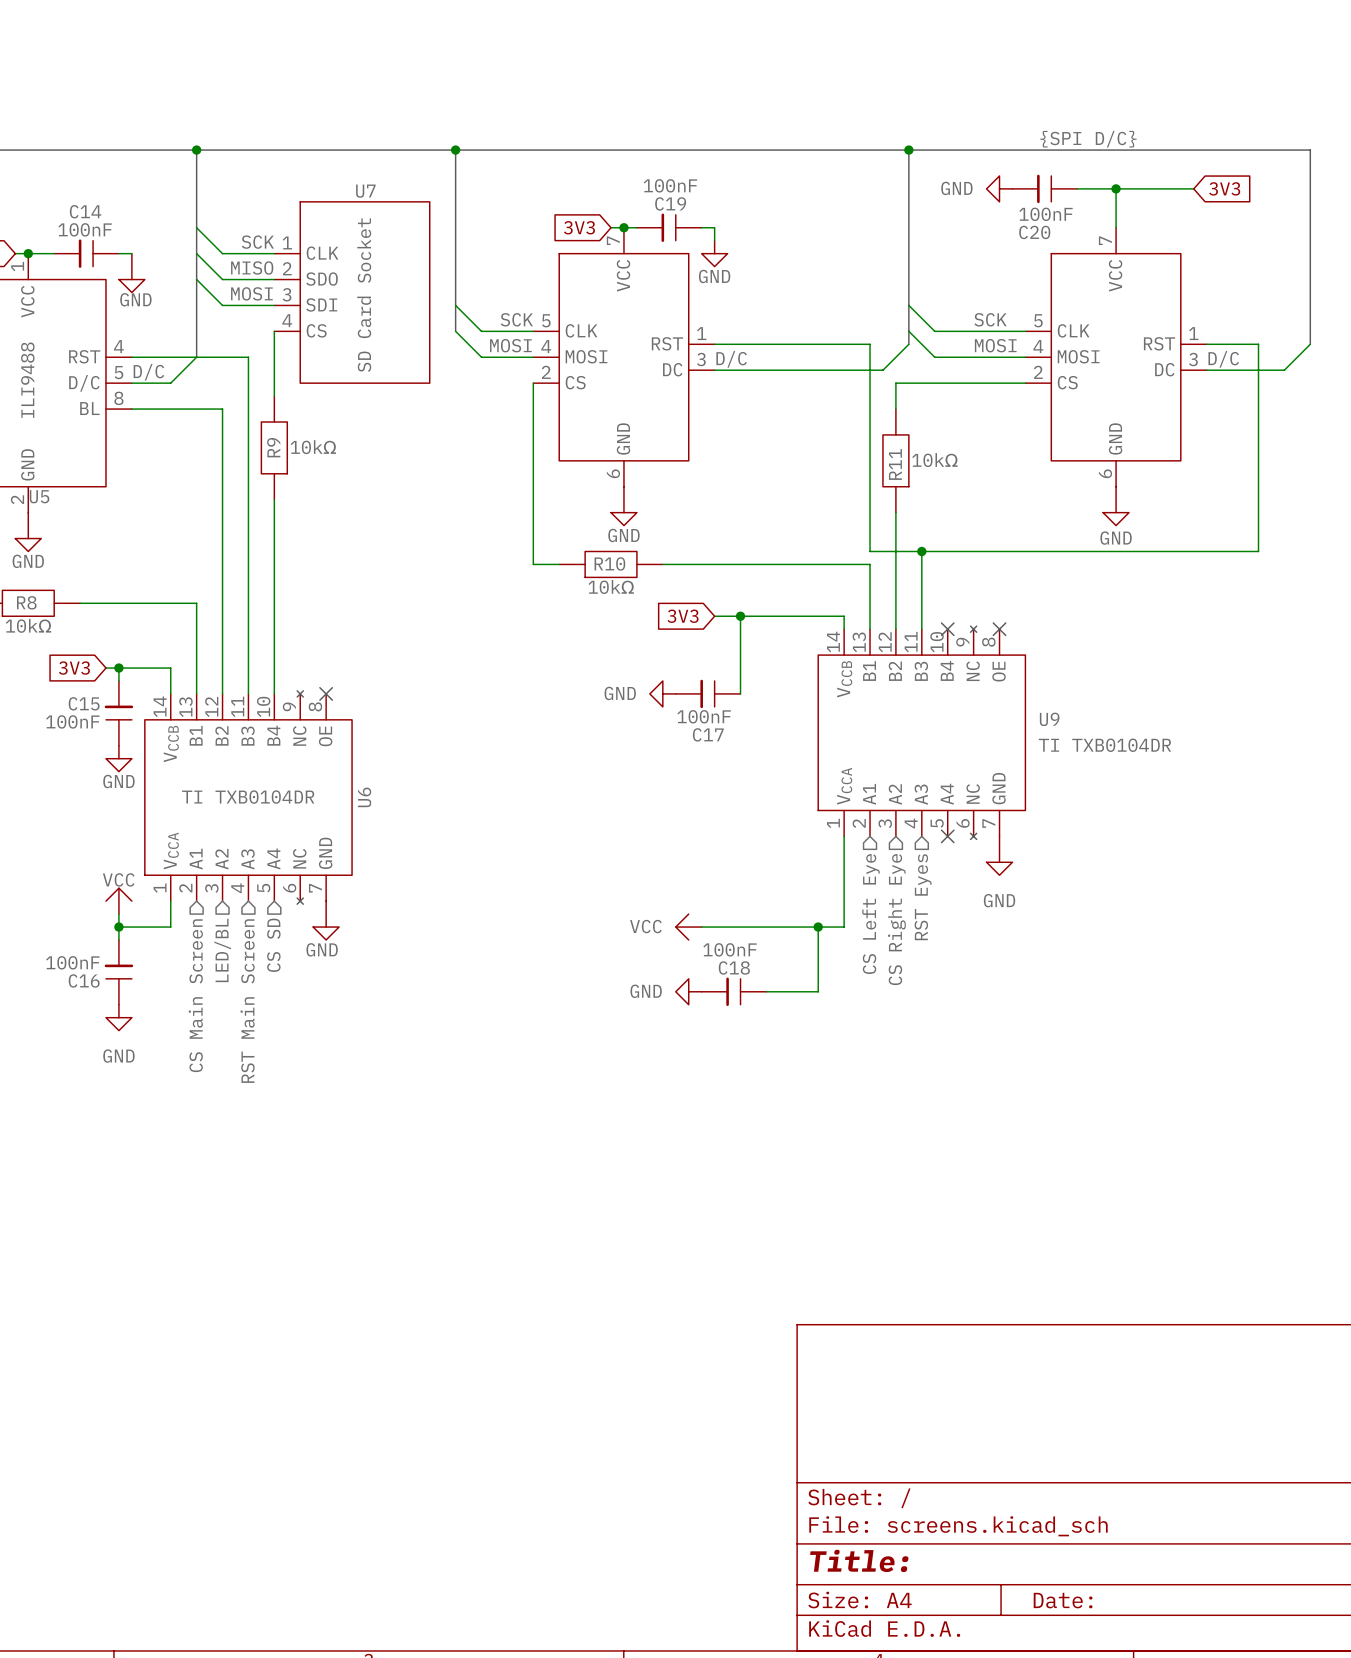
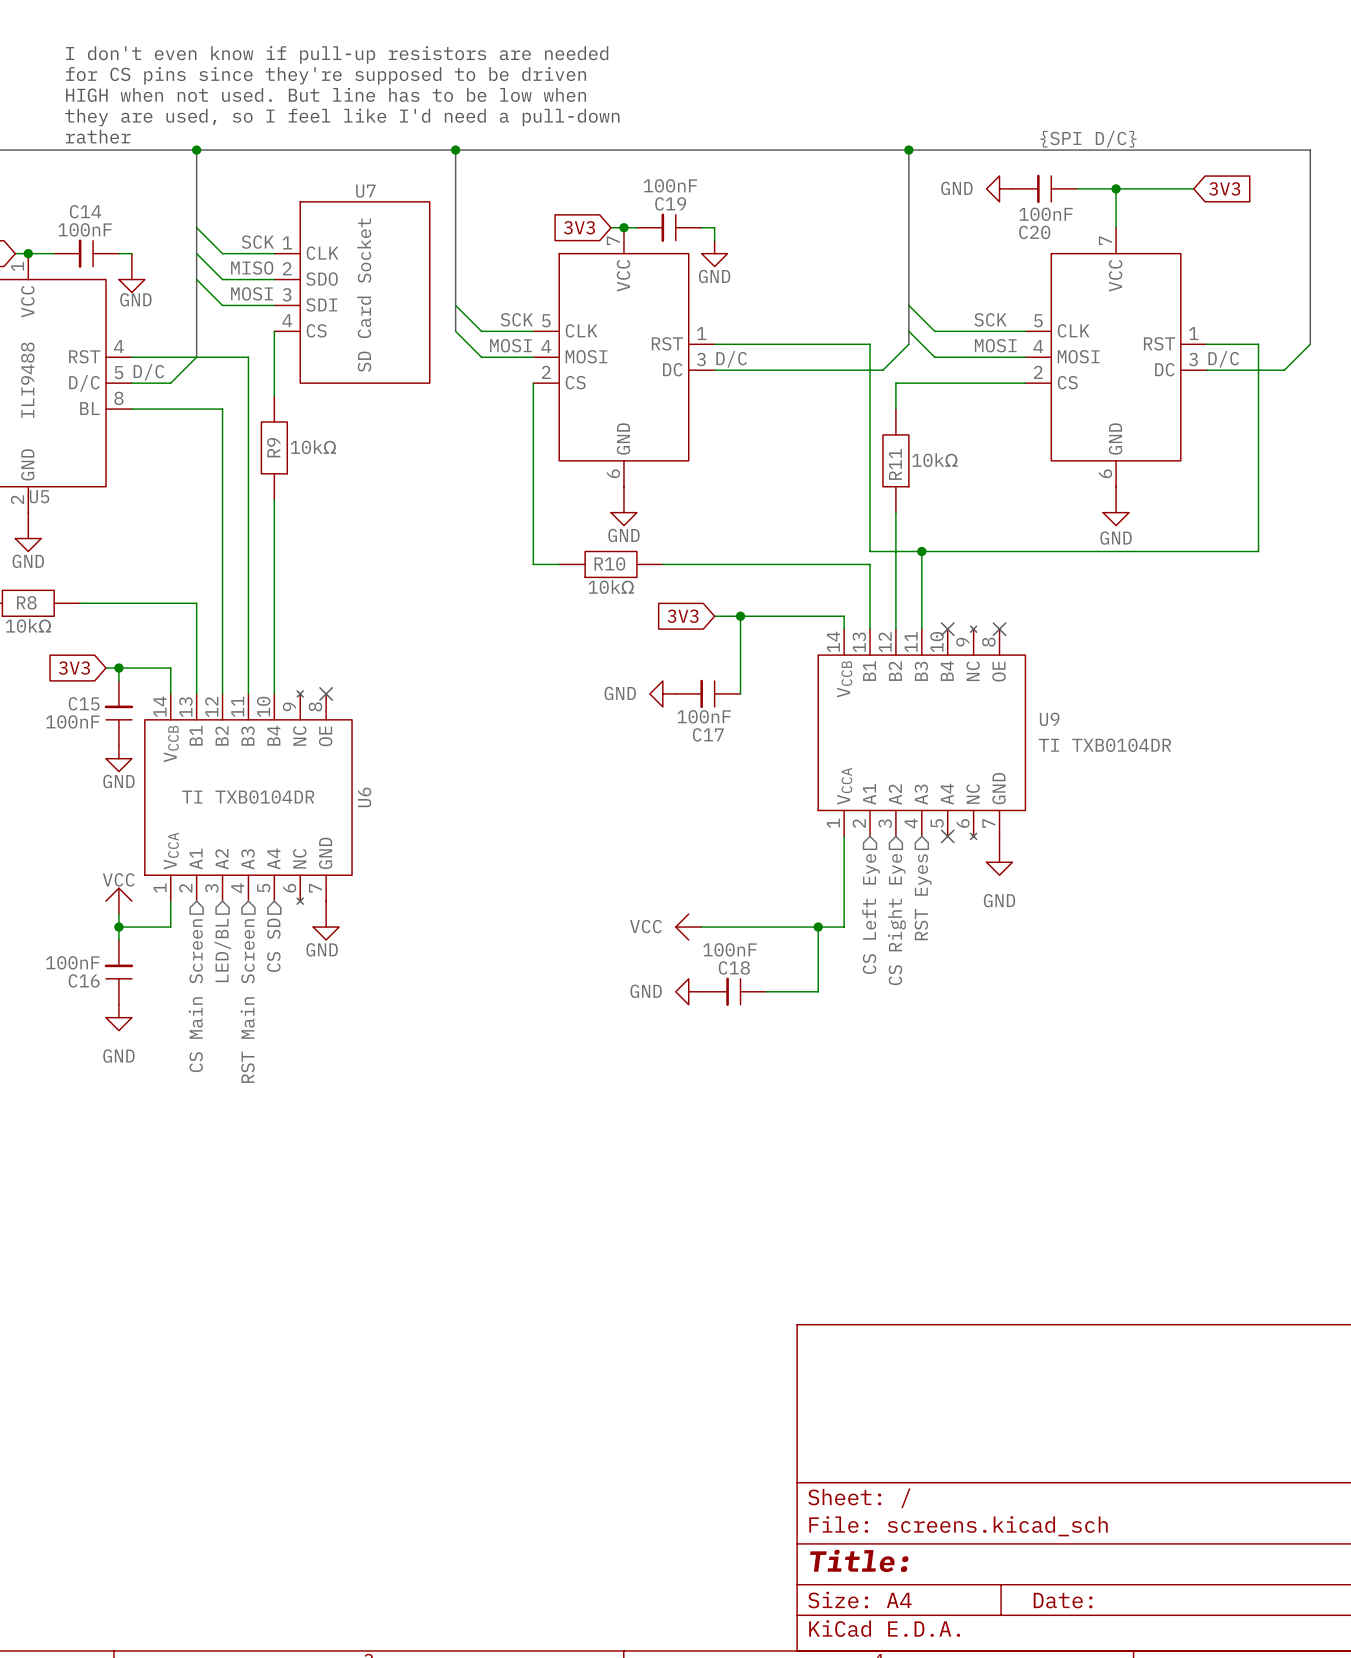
text: none -> I don't even know if pull-up resistors are needed (337, 54)
text: none -> for CS pins since they're supposed to be driven (325, 75)
text: none -> HIGH when not used. But line has to be low when (326, 94)
text: none -> they are used, so I feel like I'd need a pull-down (342, 117)
text: none -> rather (98, 136)

